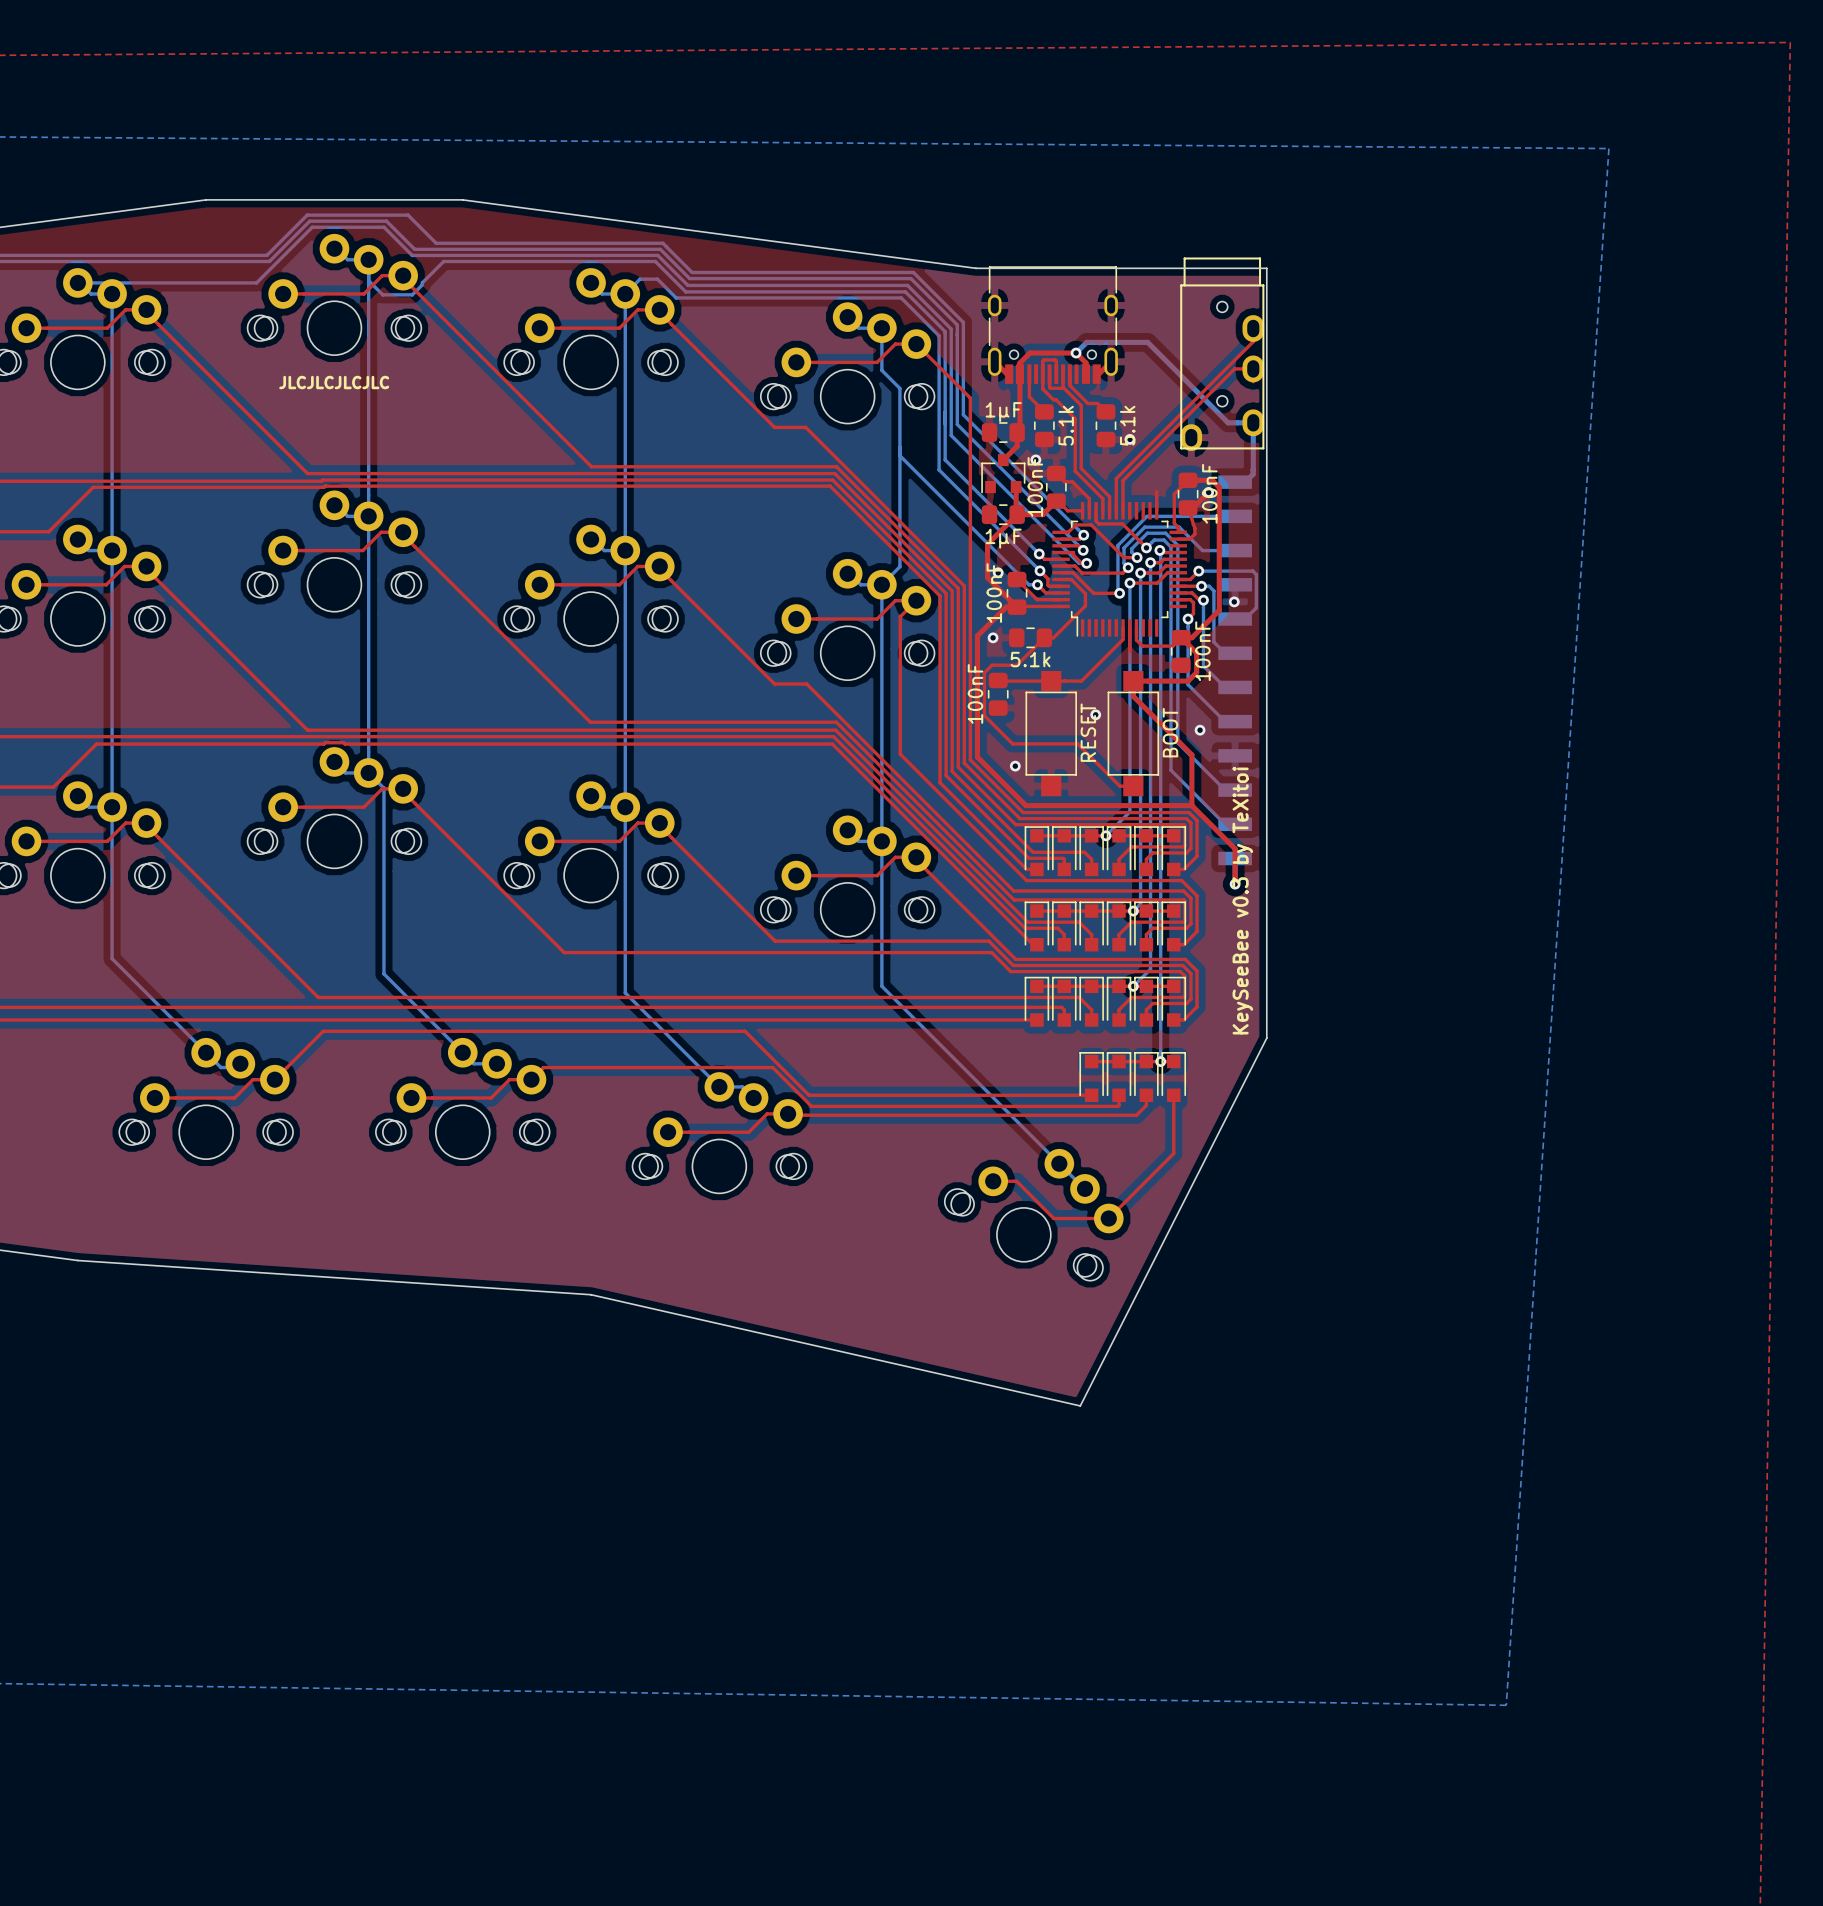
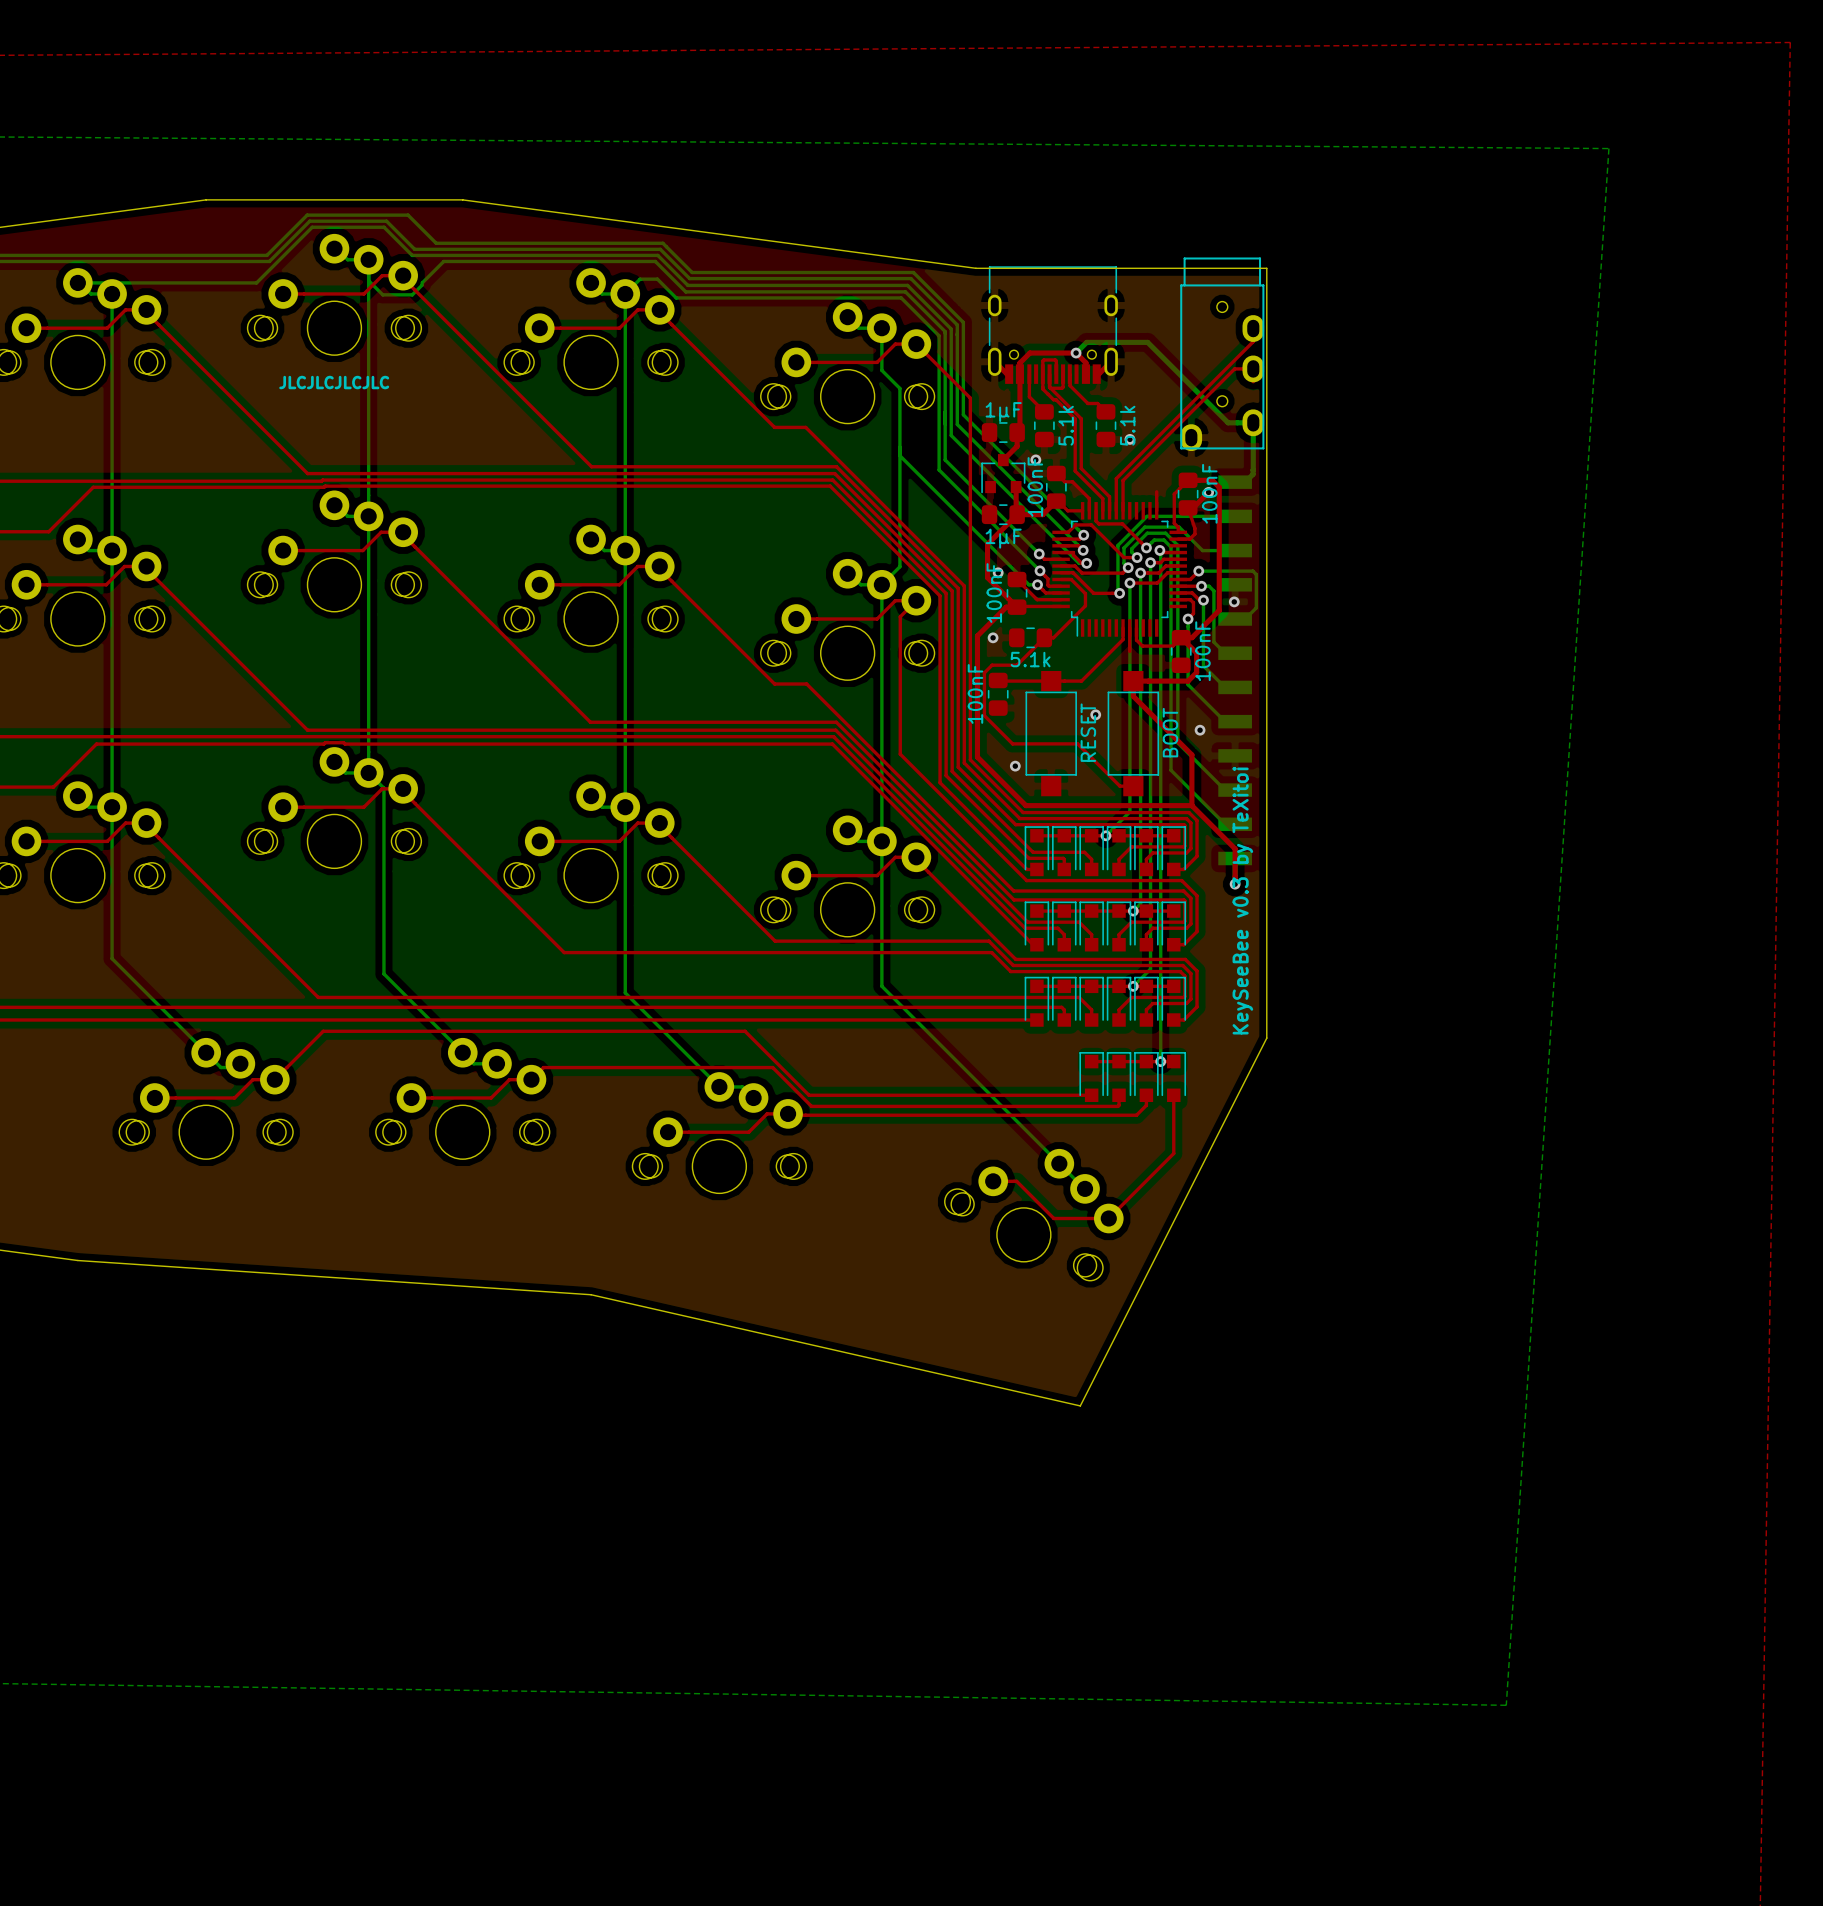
top track: (1063, 387) (1081, 405) (1081, 418) -> (1049, 387) (1081, 418)

